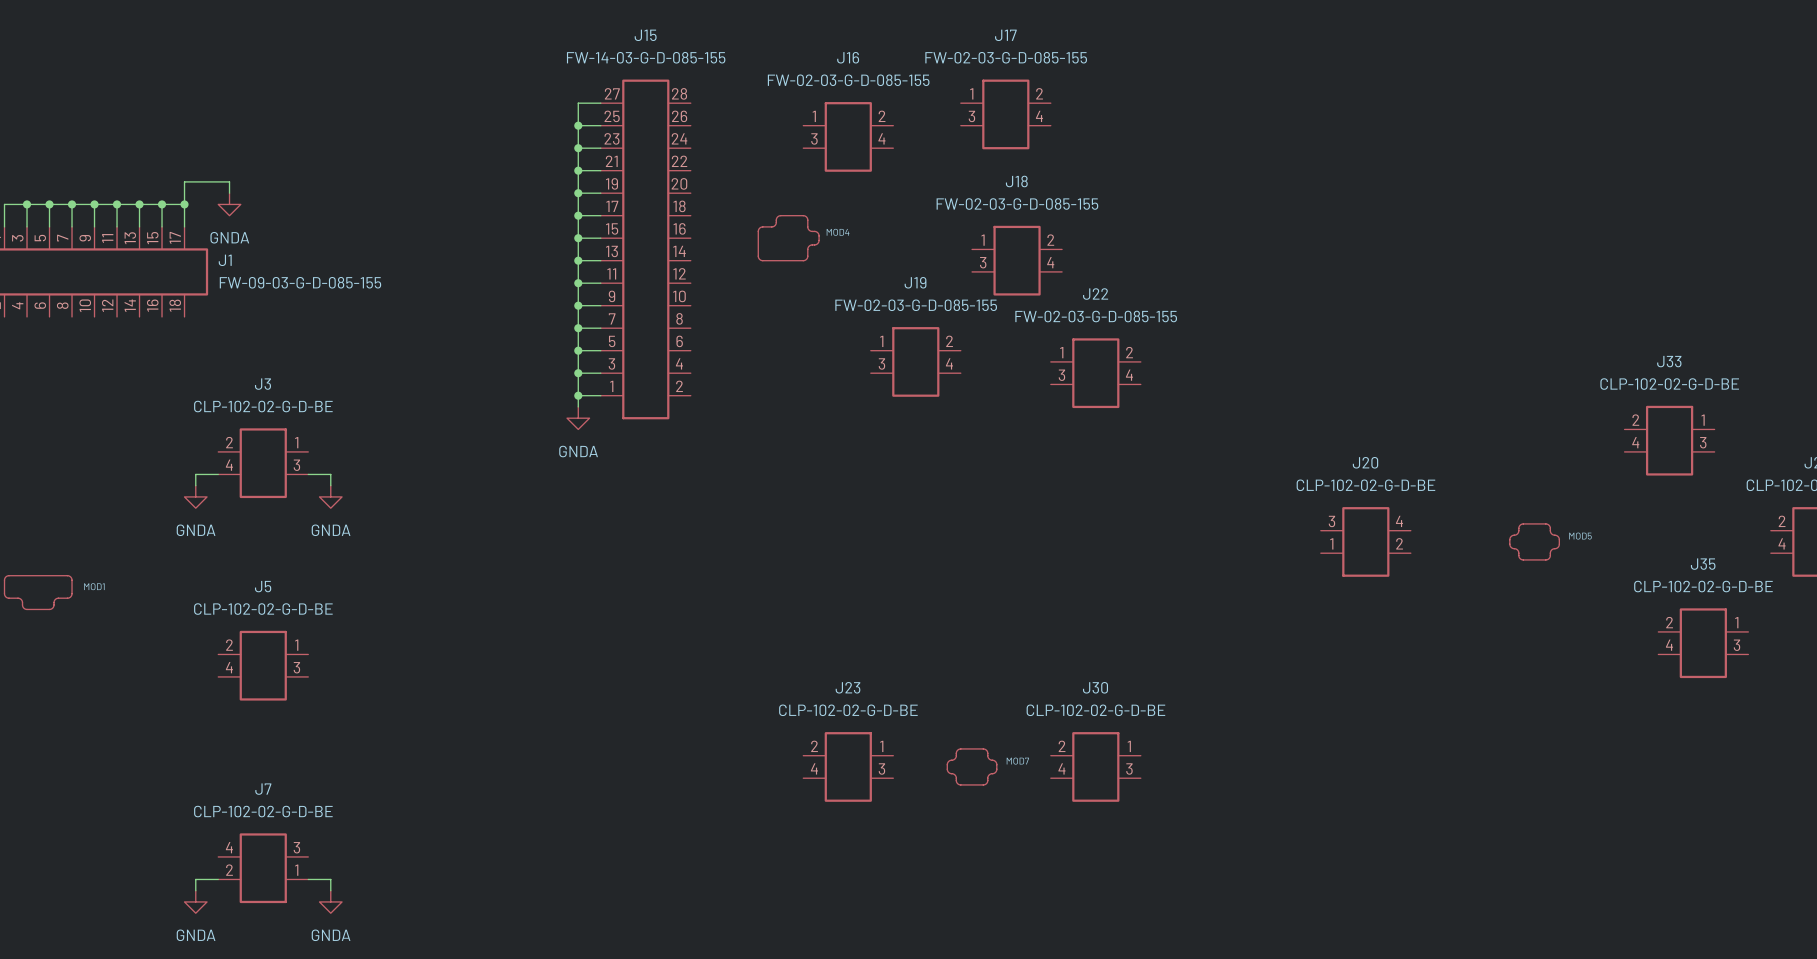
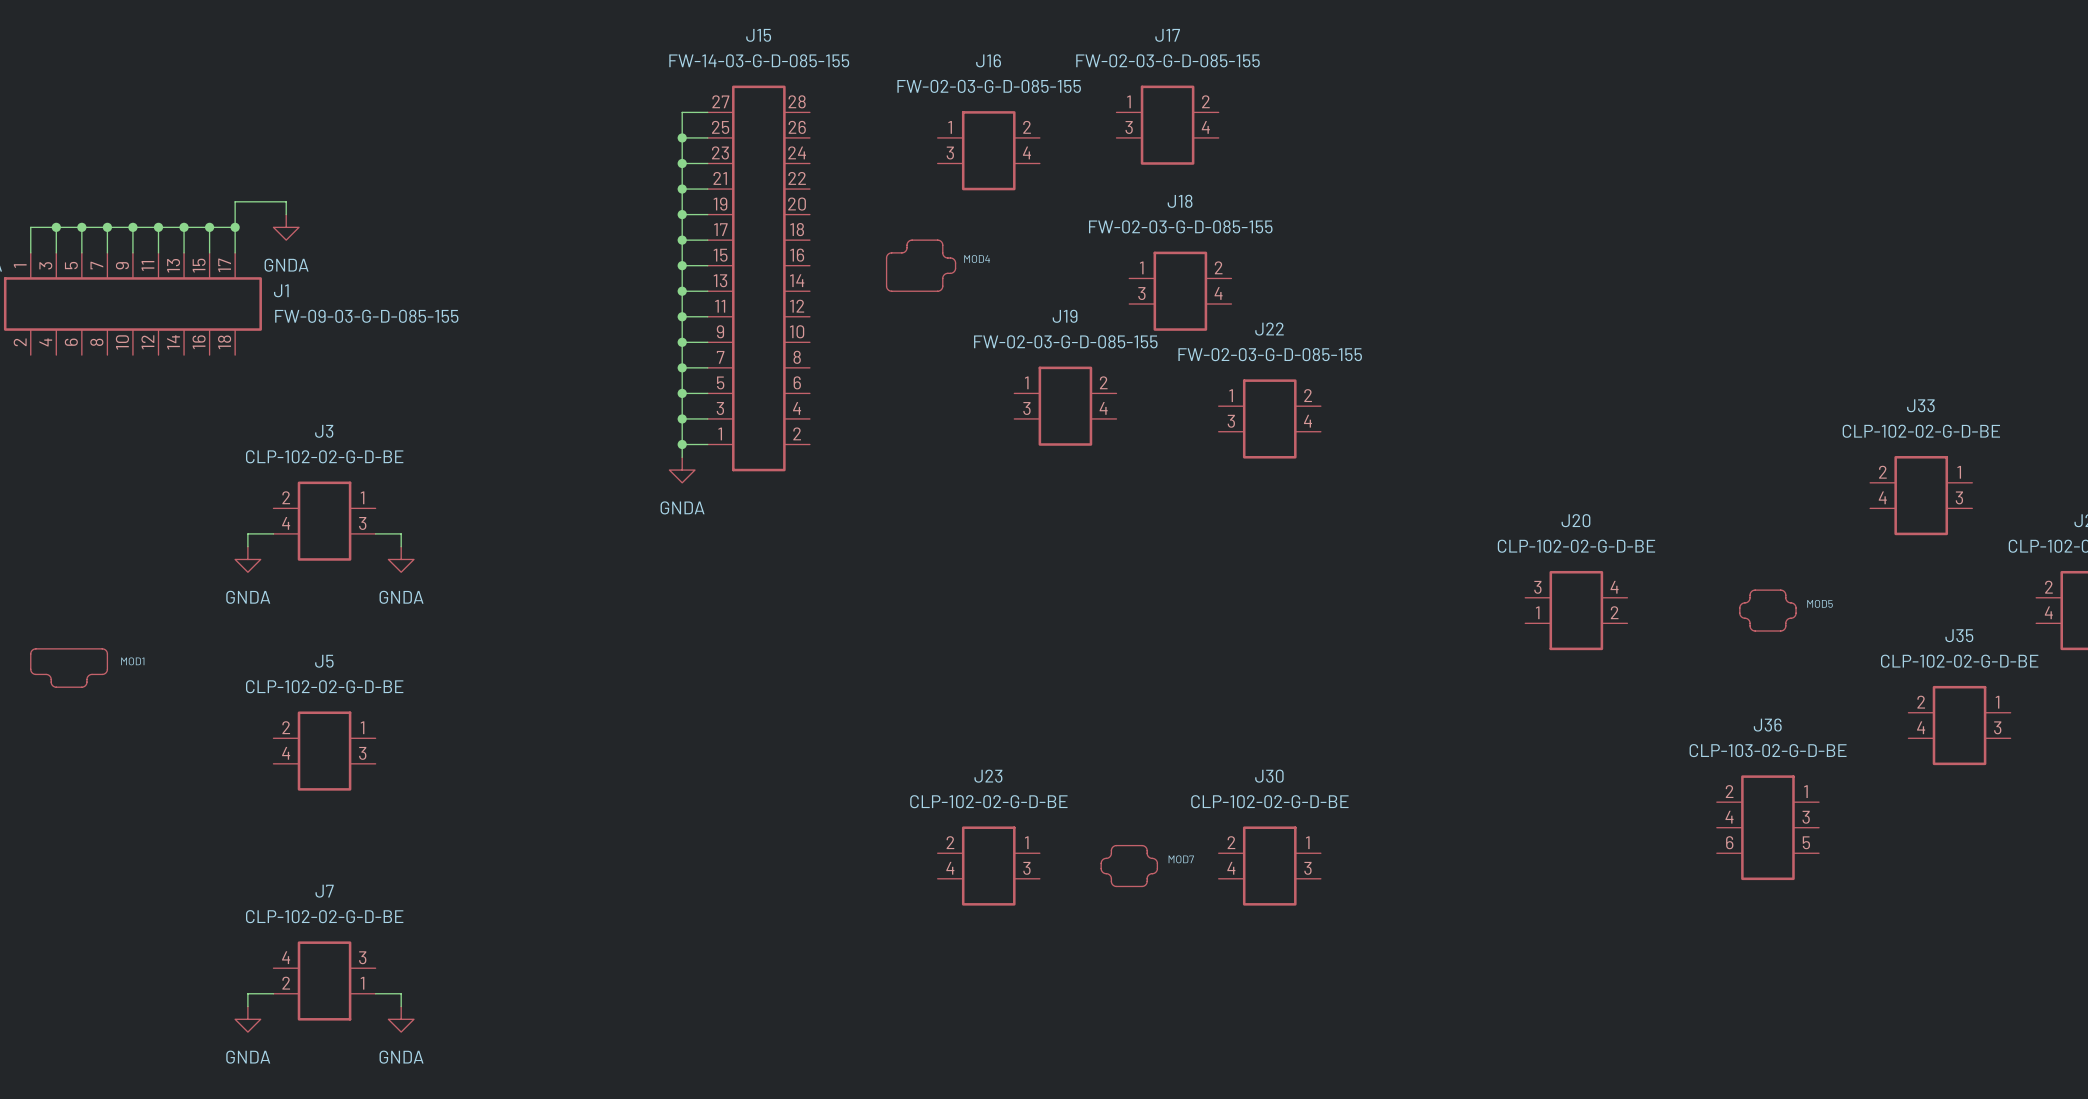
J36: none -> CLP-103-02-G-D-BE (1767, 827)

